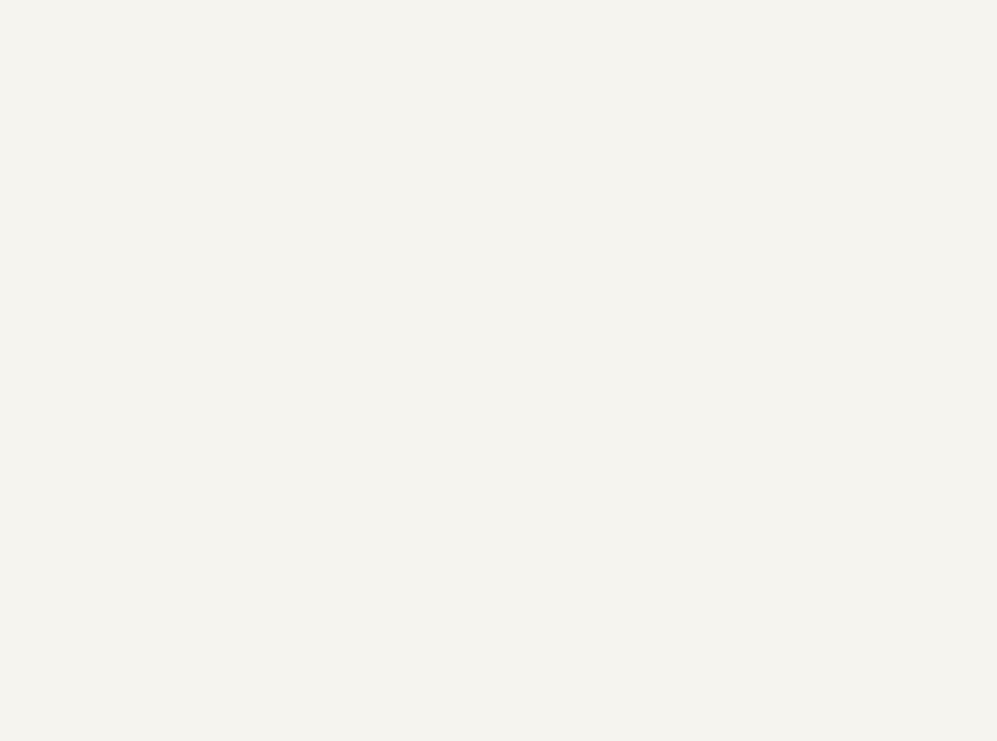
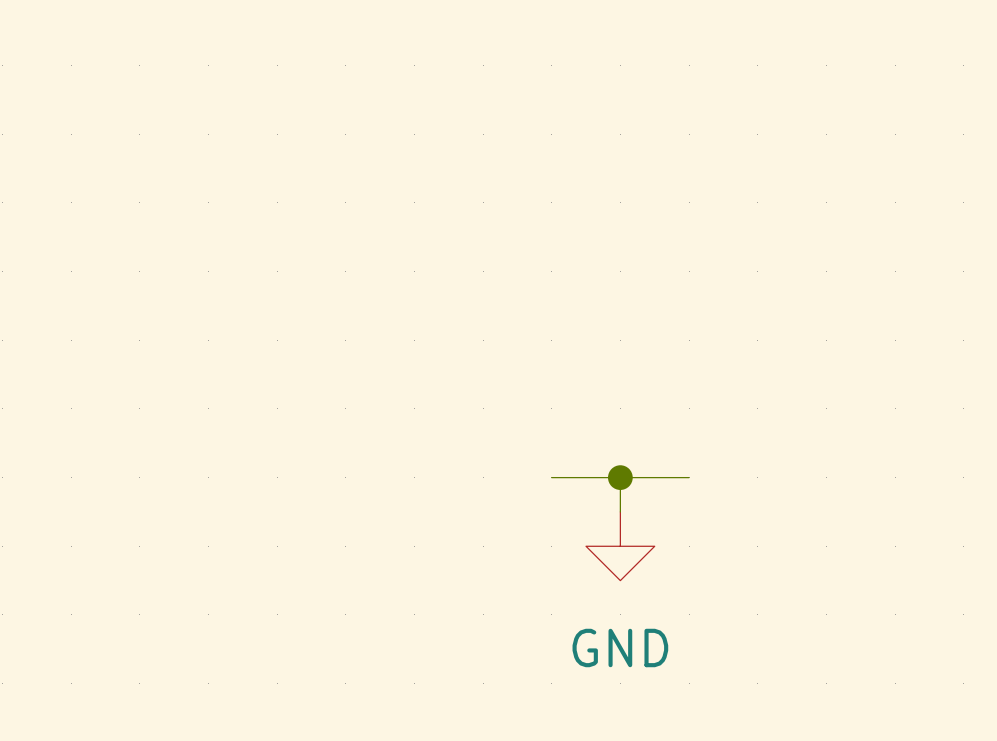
wire: none -> (551, 477) (689, 477)
wire: none -> (620, 477) (620, 511)
junction: none -> (620, 477)
power symbol: none -> GND (620, 546)

